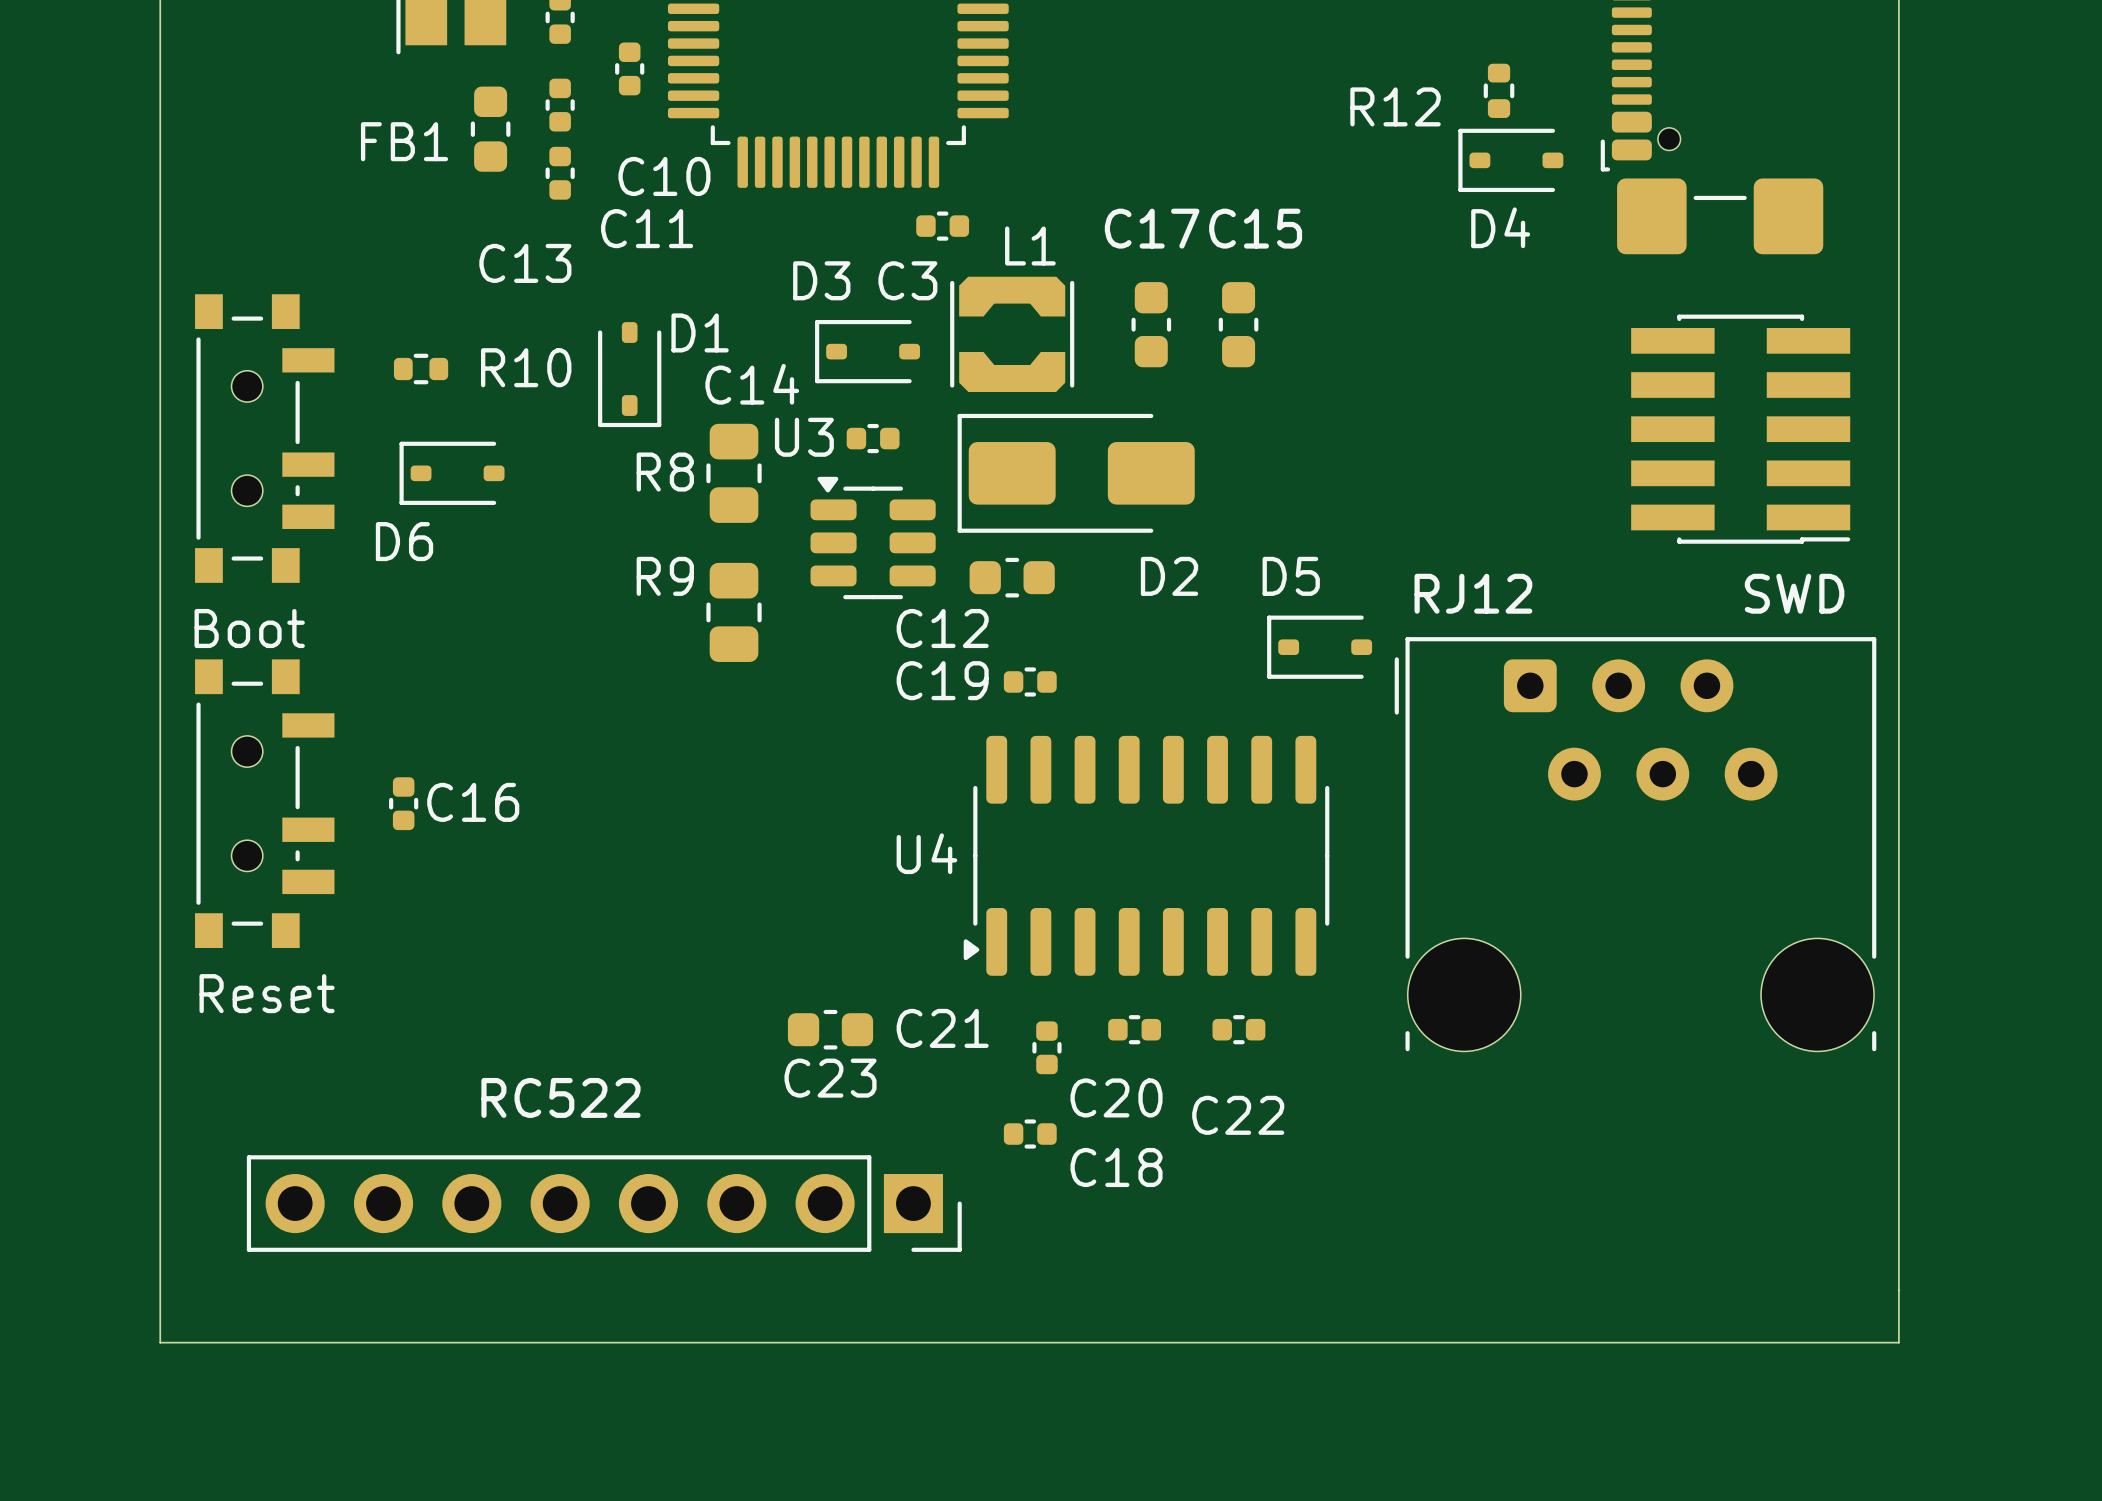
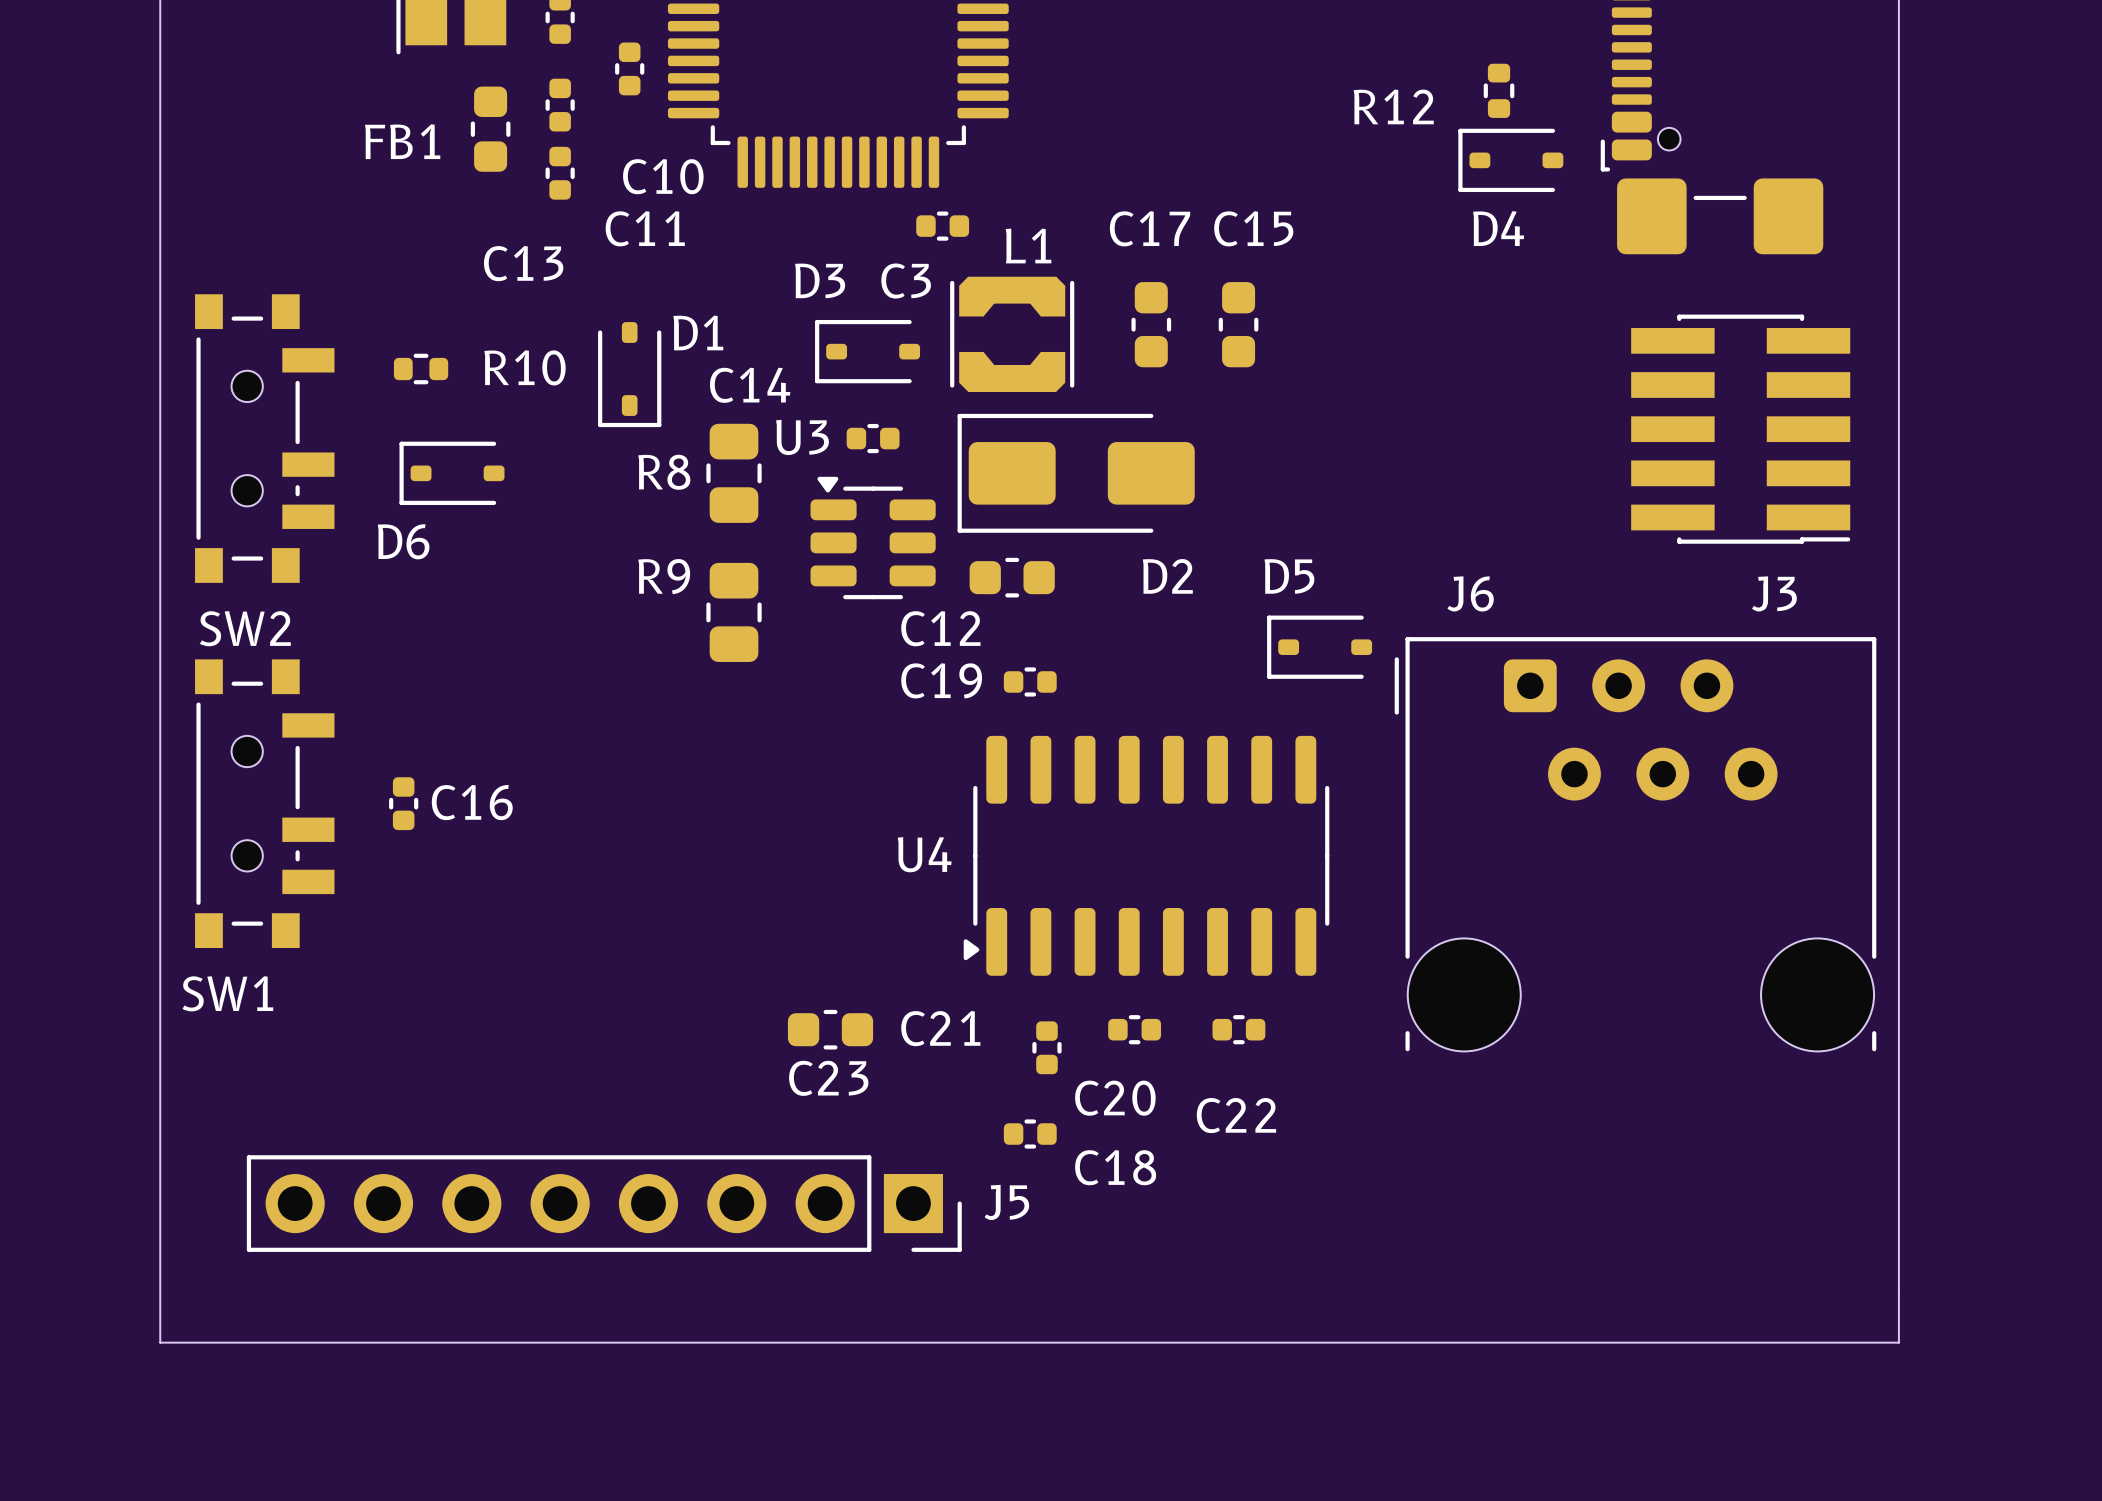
RJ12 name: RJ12 (1473, 593) -> J6 (1470, 593)
SWD name: SWD (1794, 593) -> J3 (1774, 593)
Boot name: Boot (249, 628) -> SW2 (245, 628)
Reset name: Reset (267, 993) -> SW1 (227, 993)
RC522 name: RC522 (560, 1097) -> J5 (1006, 1202)

